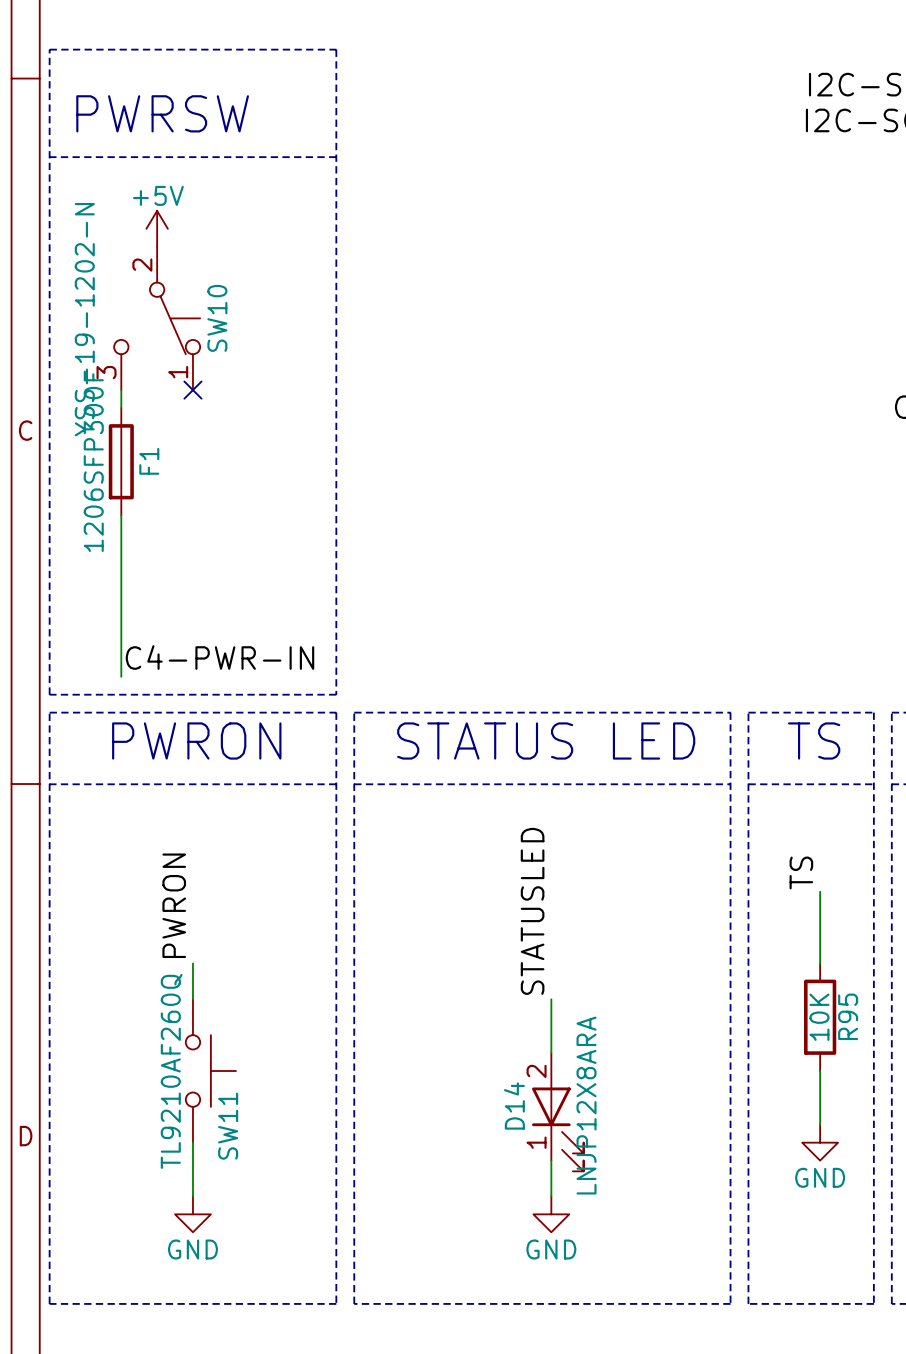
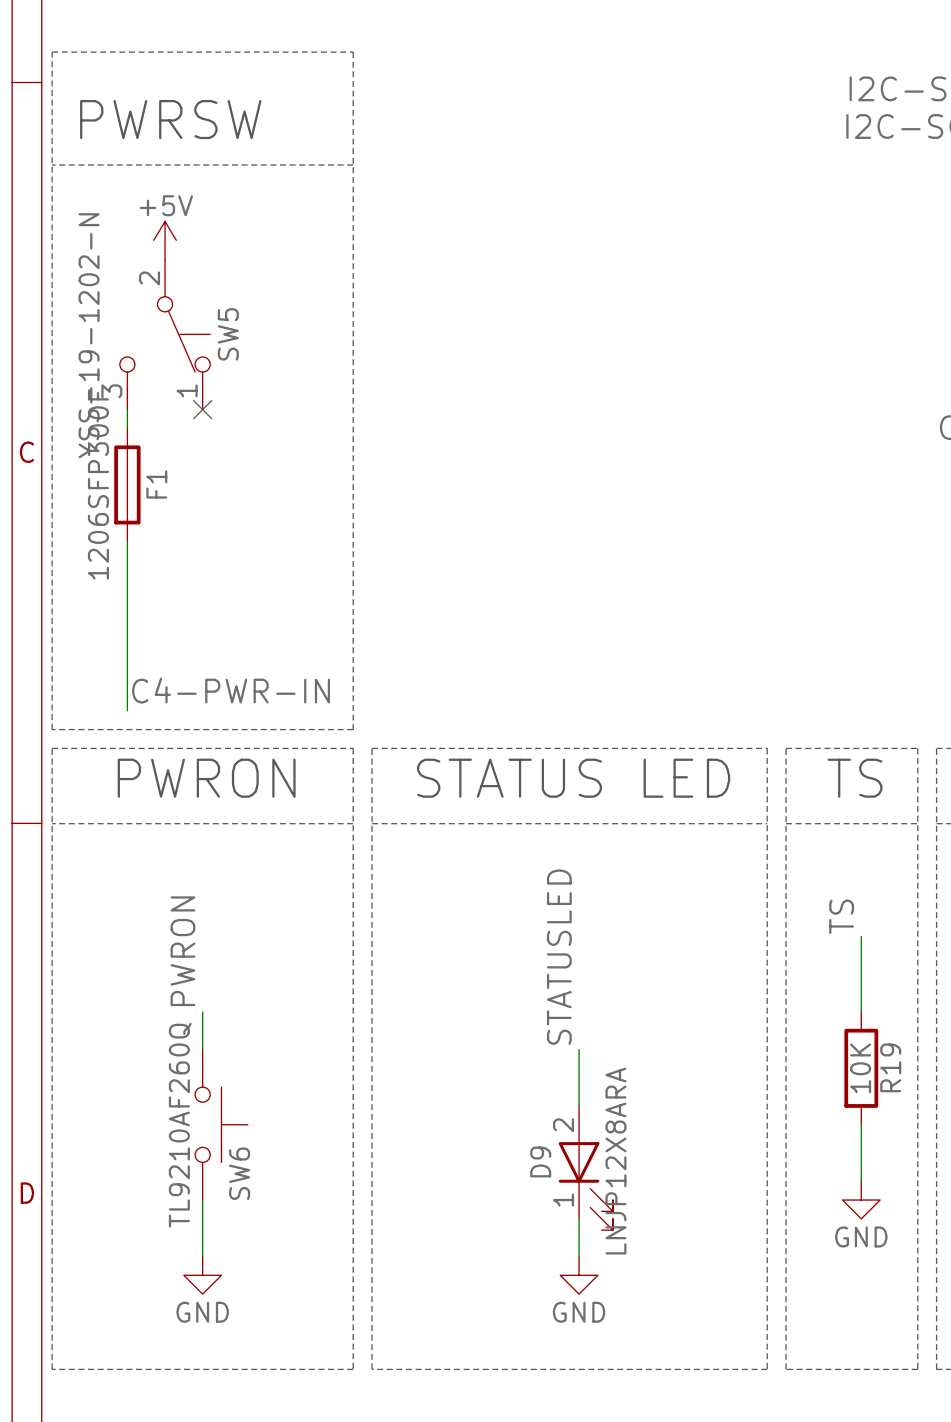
SW10 name: SW10 (217, 318) -> SW5 (228, 334)
R95 name: R95 (848, 1016) -> R19 (890, 1067)
D14 name: D14 (514, 1105) -> D9 (540, 1161)
SW11 name: SW11 (228, 1126) -> SW6 (239, 1173)

